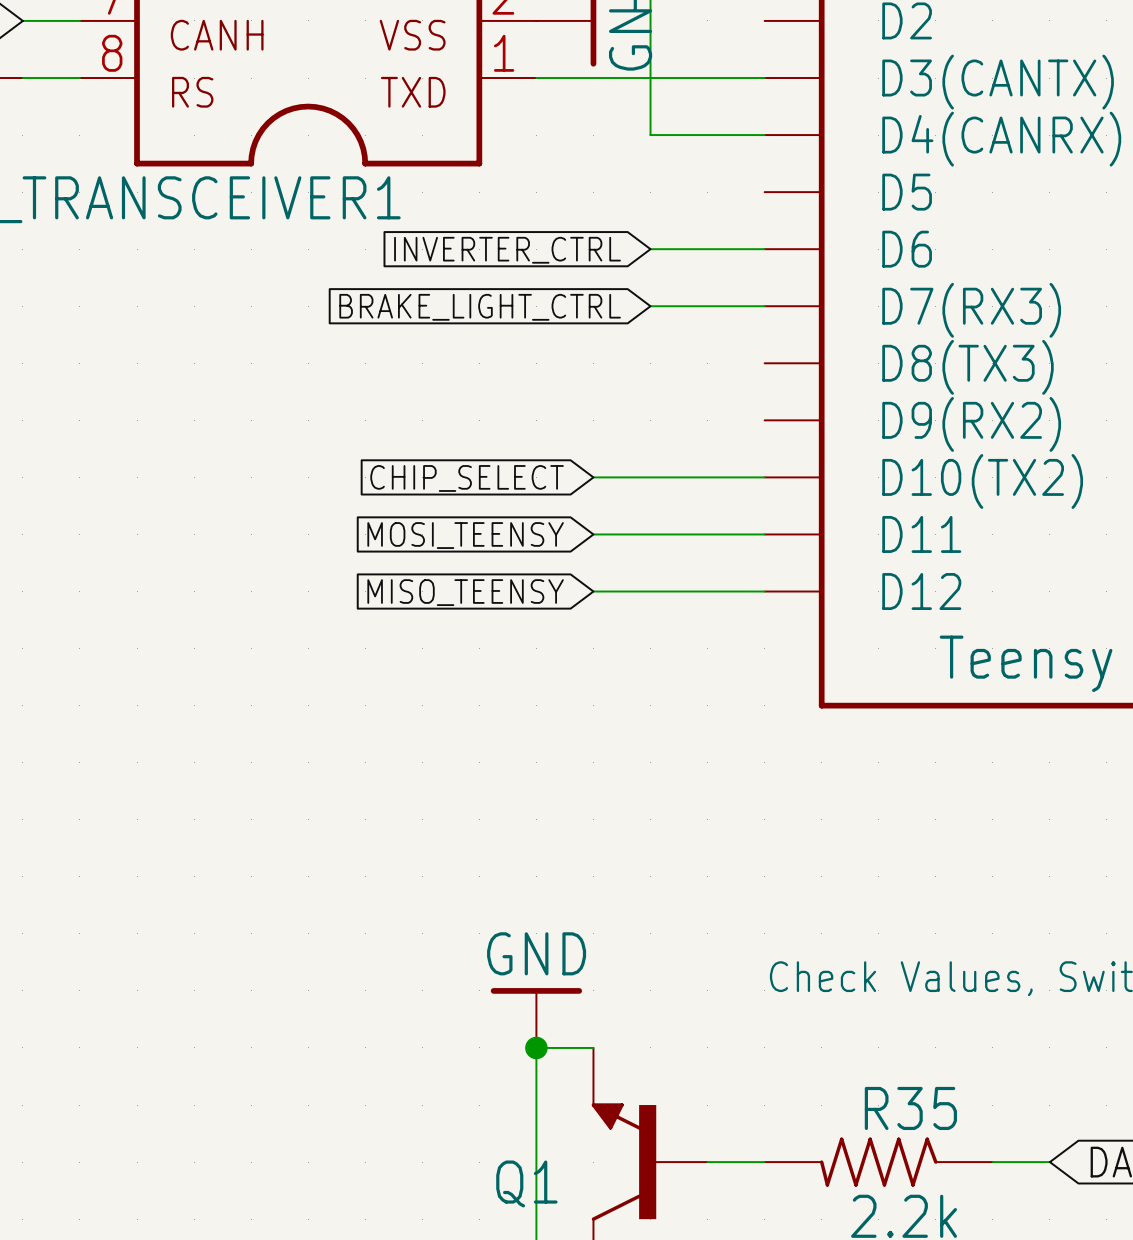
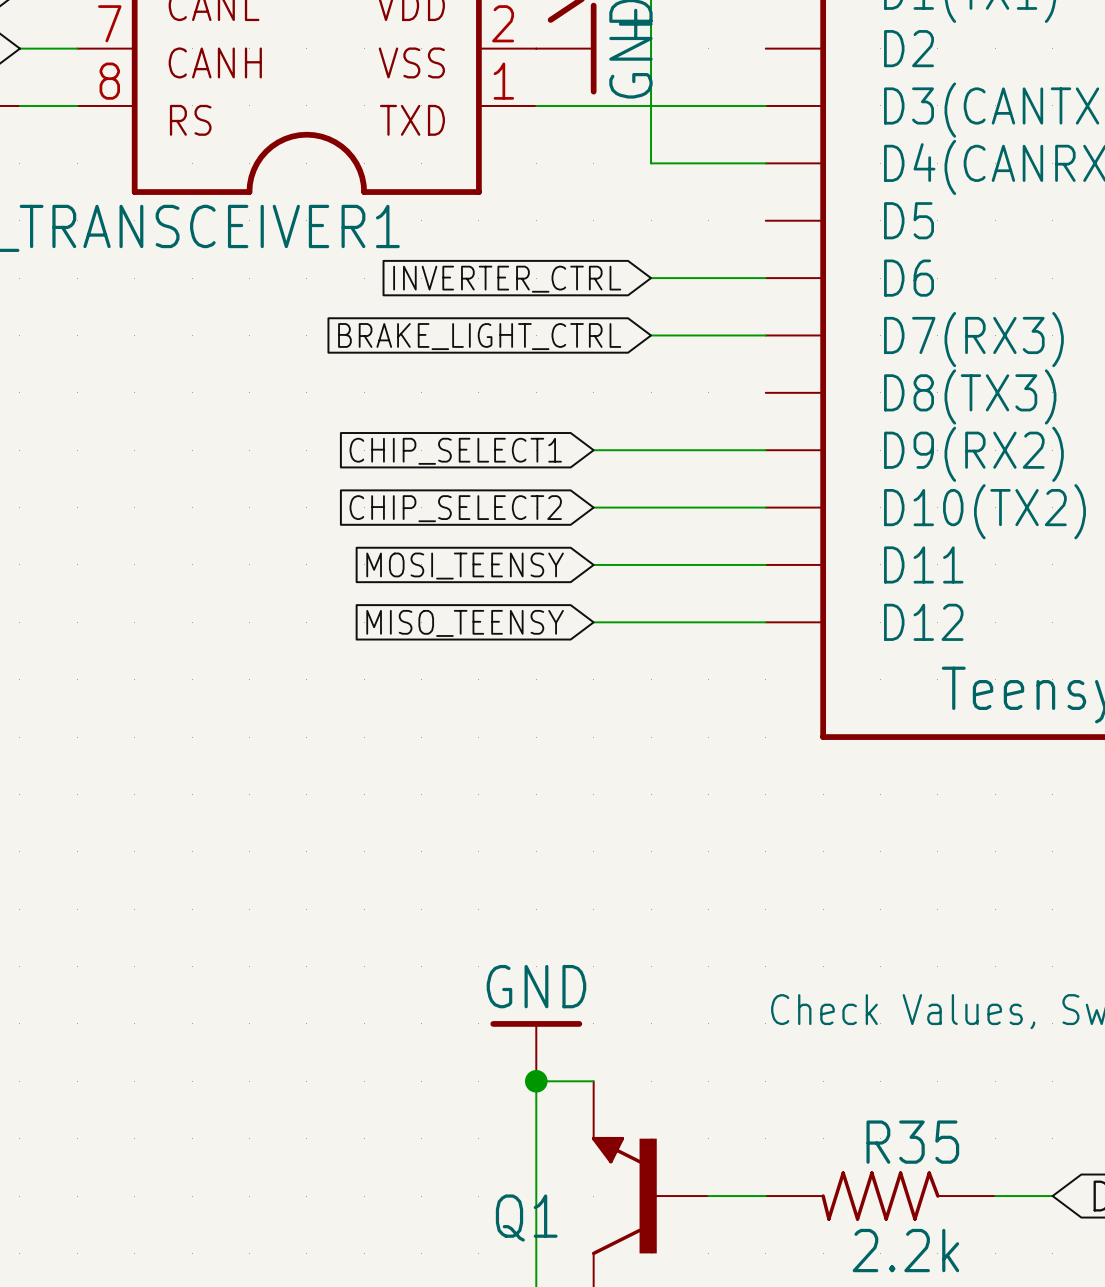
wire: none -> (593, 450) (765, 450)
global label: none -> CHIP_SELECT1 (455, 451)
global label: CHIP_SELECT (467, 478) -> CHIP_SELECT2 (455, 508)

